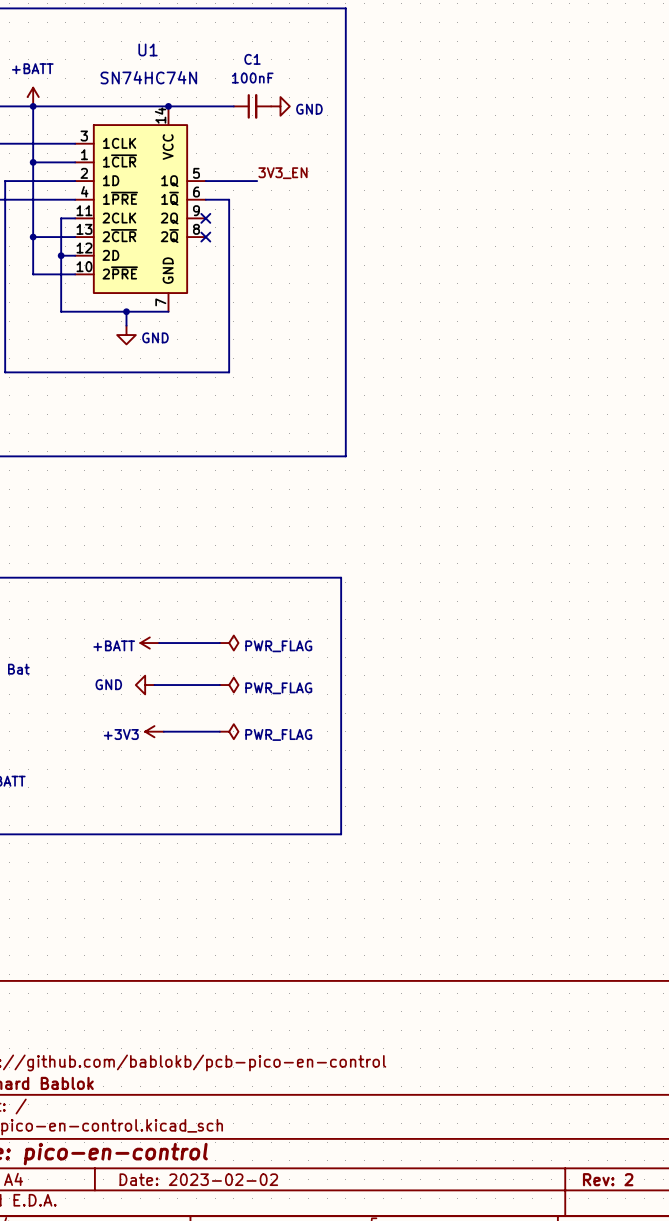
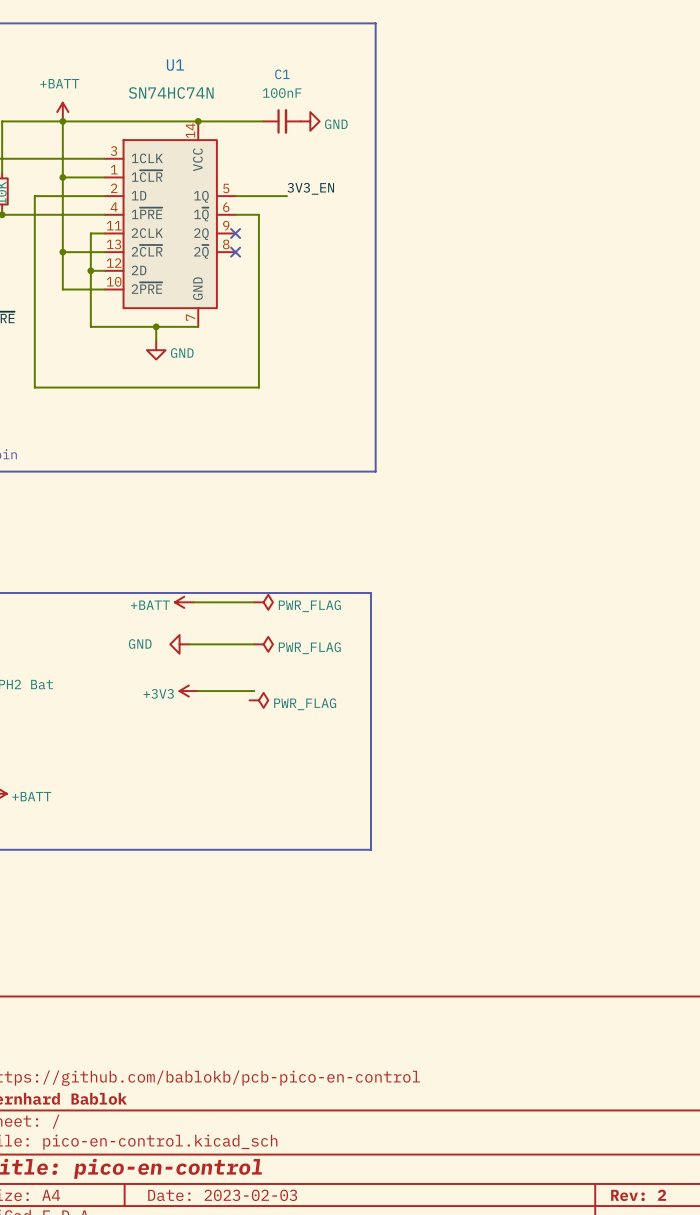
power symbol: none -> PWR_FLAG (263, 602)
power symbol position: +BATT (149, 643) -> +BATT (184, 602)
wire: (159, 643) (219, 643) -> (193, 602) (254, 602)
power symbol position: PWR_FLAG (229, 643) -> PWR_FLAG (263, 644)
power symbol position: GND (145, 685) -> GND (179, 644)
wire: (154, 685) (219, 685) -> (188, 644) (254, 644)
power symbol position: +3V3 (154, 731) -> +3V3 (188, 691)
wire: (163, 731) (219, 731) -> (198, 691) (254, 691)
power symbol: PWR_FLAG (229, 731) -> none
title block: Date: 2023-02-02 (198, 1179) -> Date: 2023-02-03 (222, 1195)

